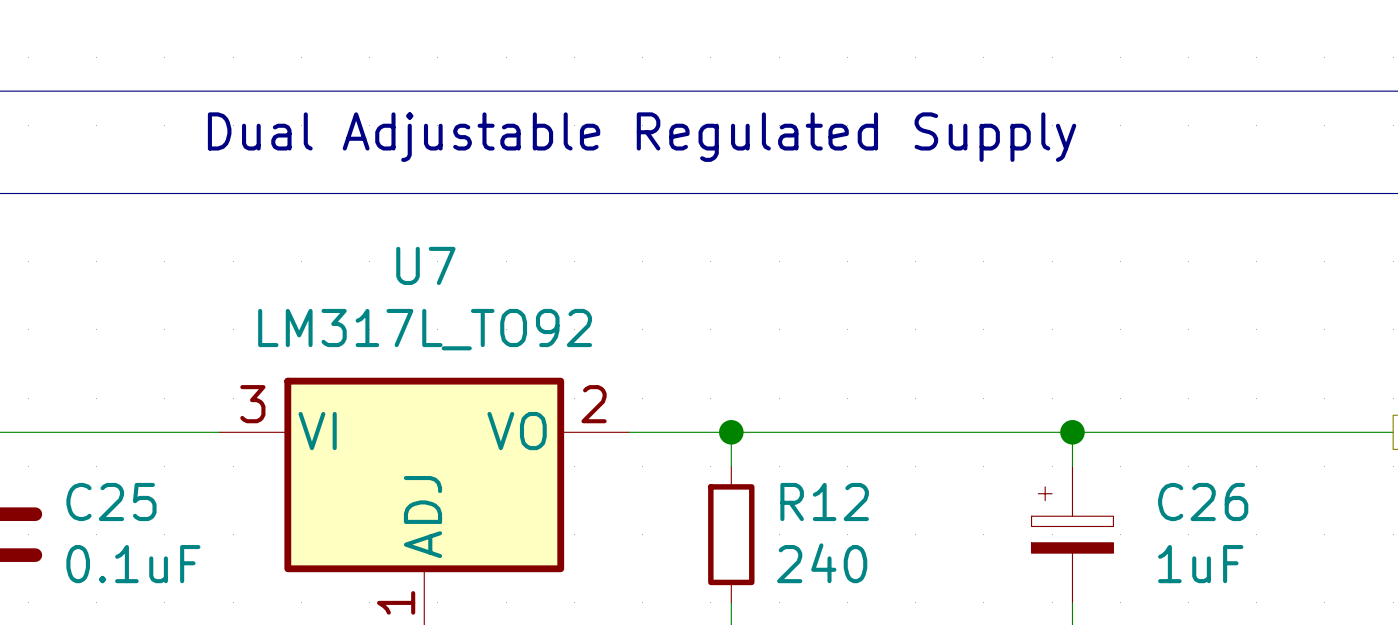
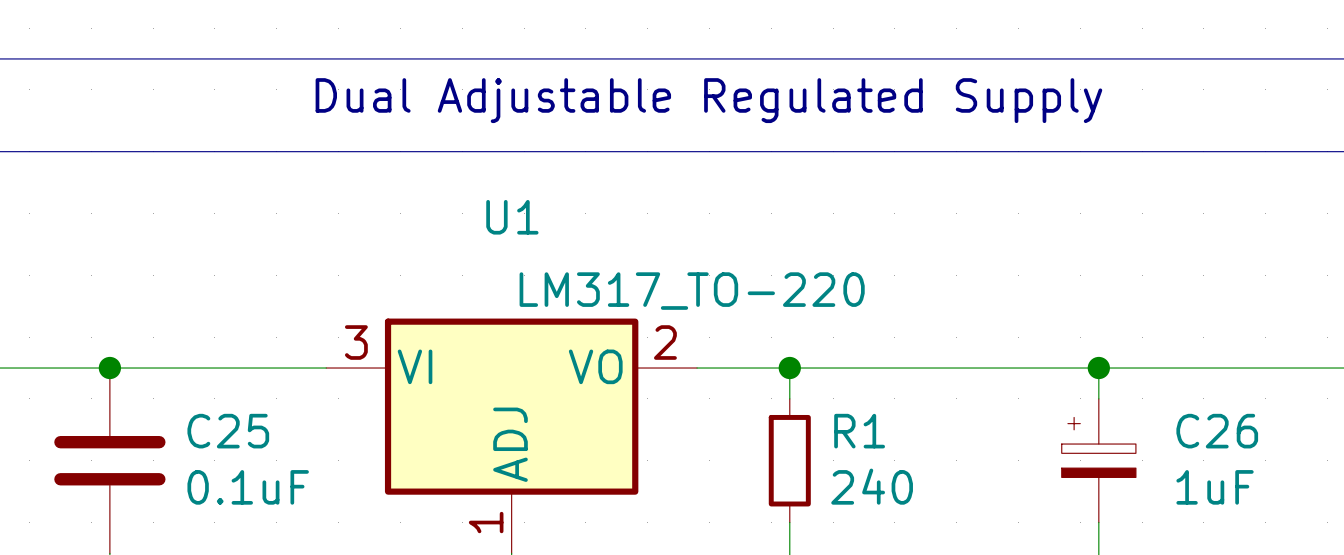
U7 name: U7 (425, 265) -> U1 (512, 217)
U7 value: LM317L_TO92 (425, 329) -> LM317_TO-220 (692, 291)
R12 name: R12 (824, 502) -> R1 (859, 431)

